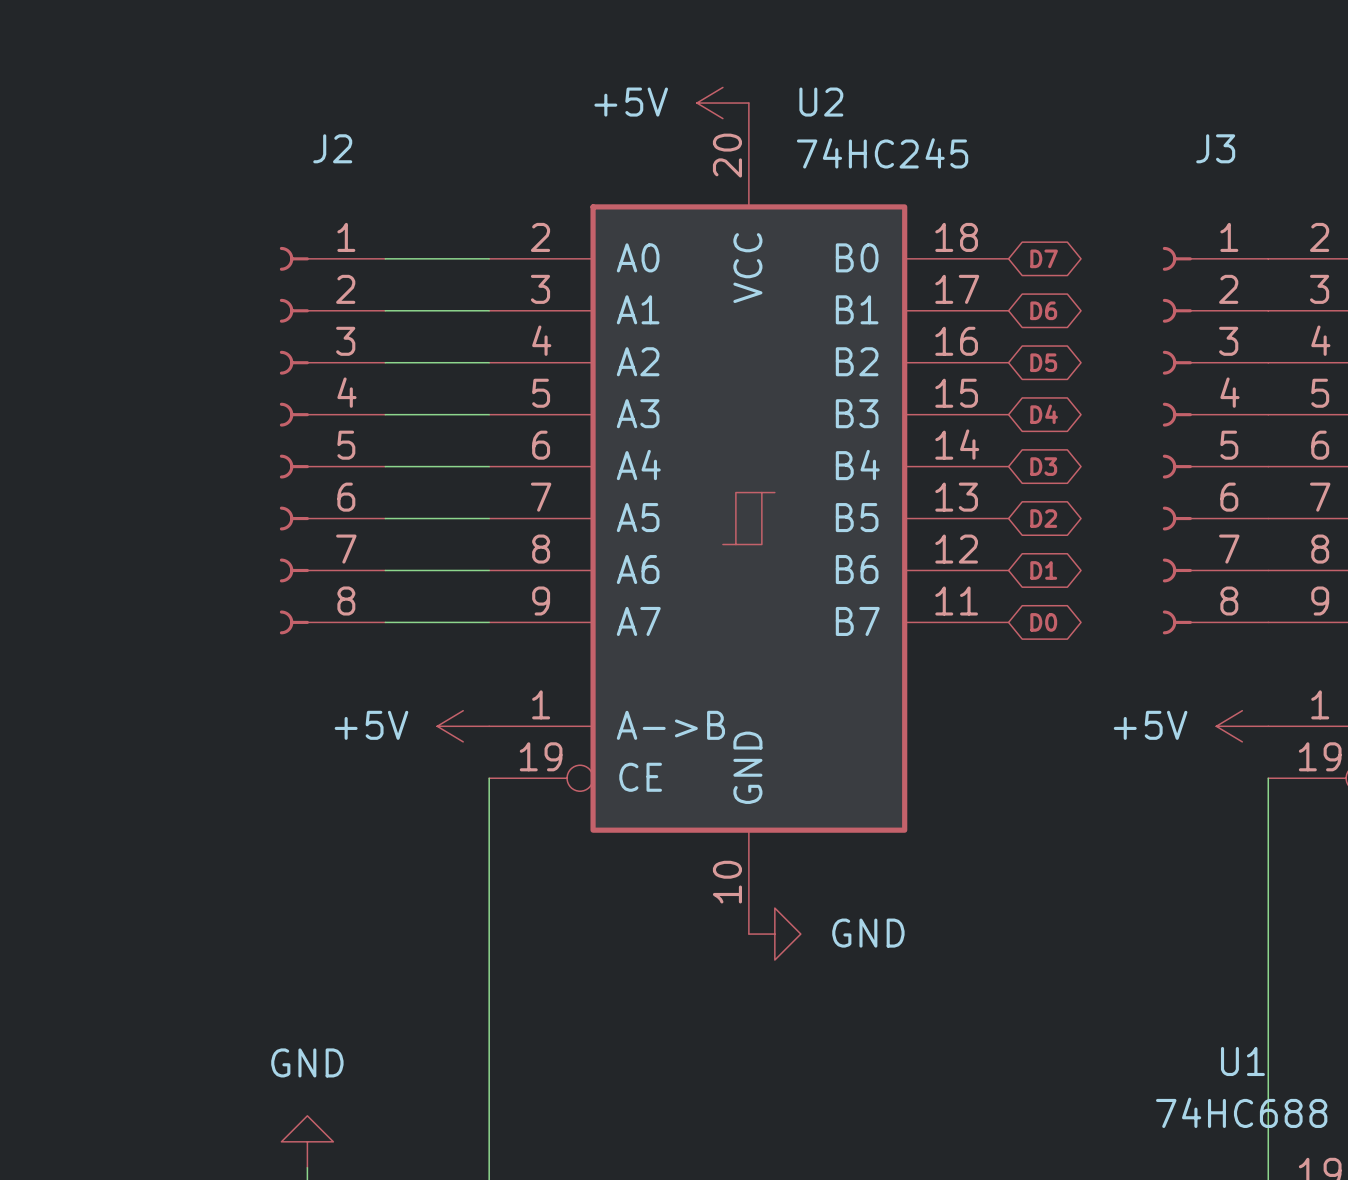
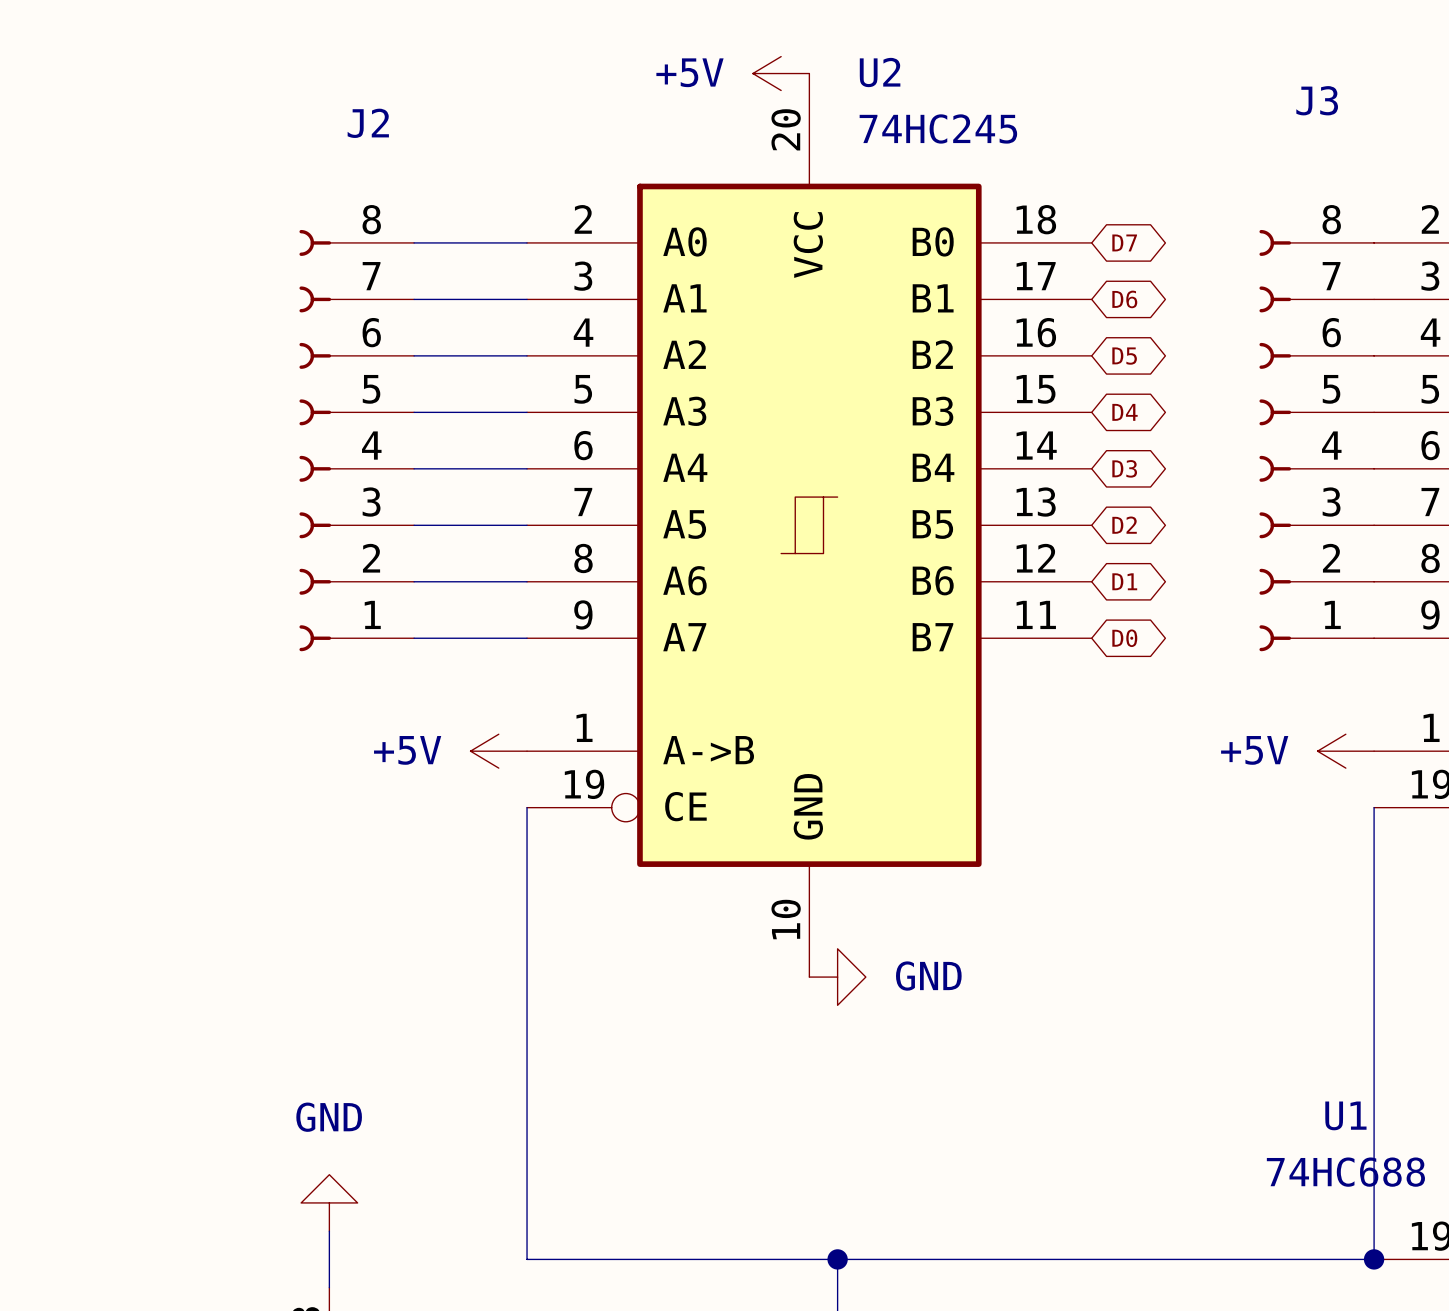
J2 flip: as is (294, 440) -> up-down (315, 440)
J3 flip: as is (1177, 440) -> up-down (1275, 440)

